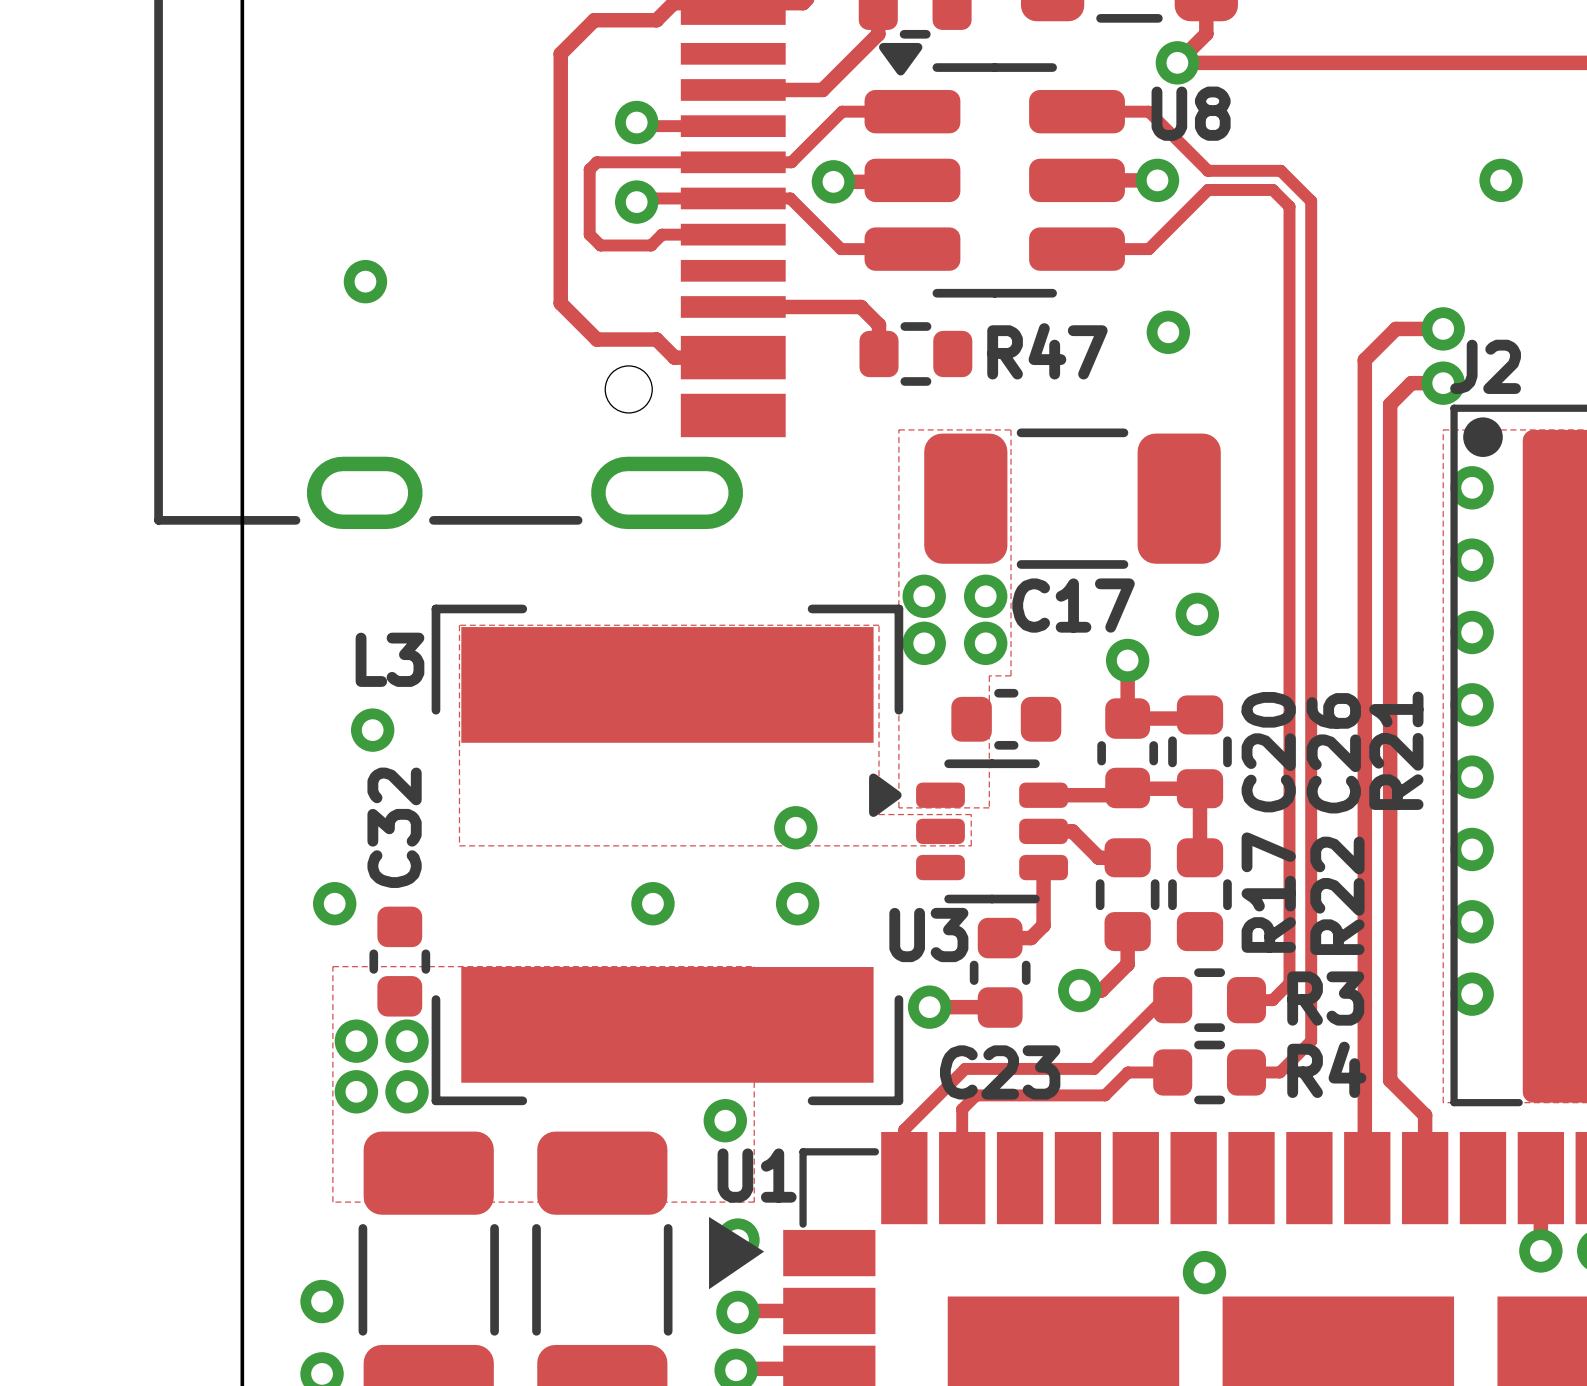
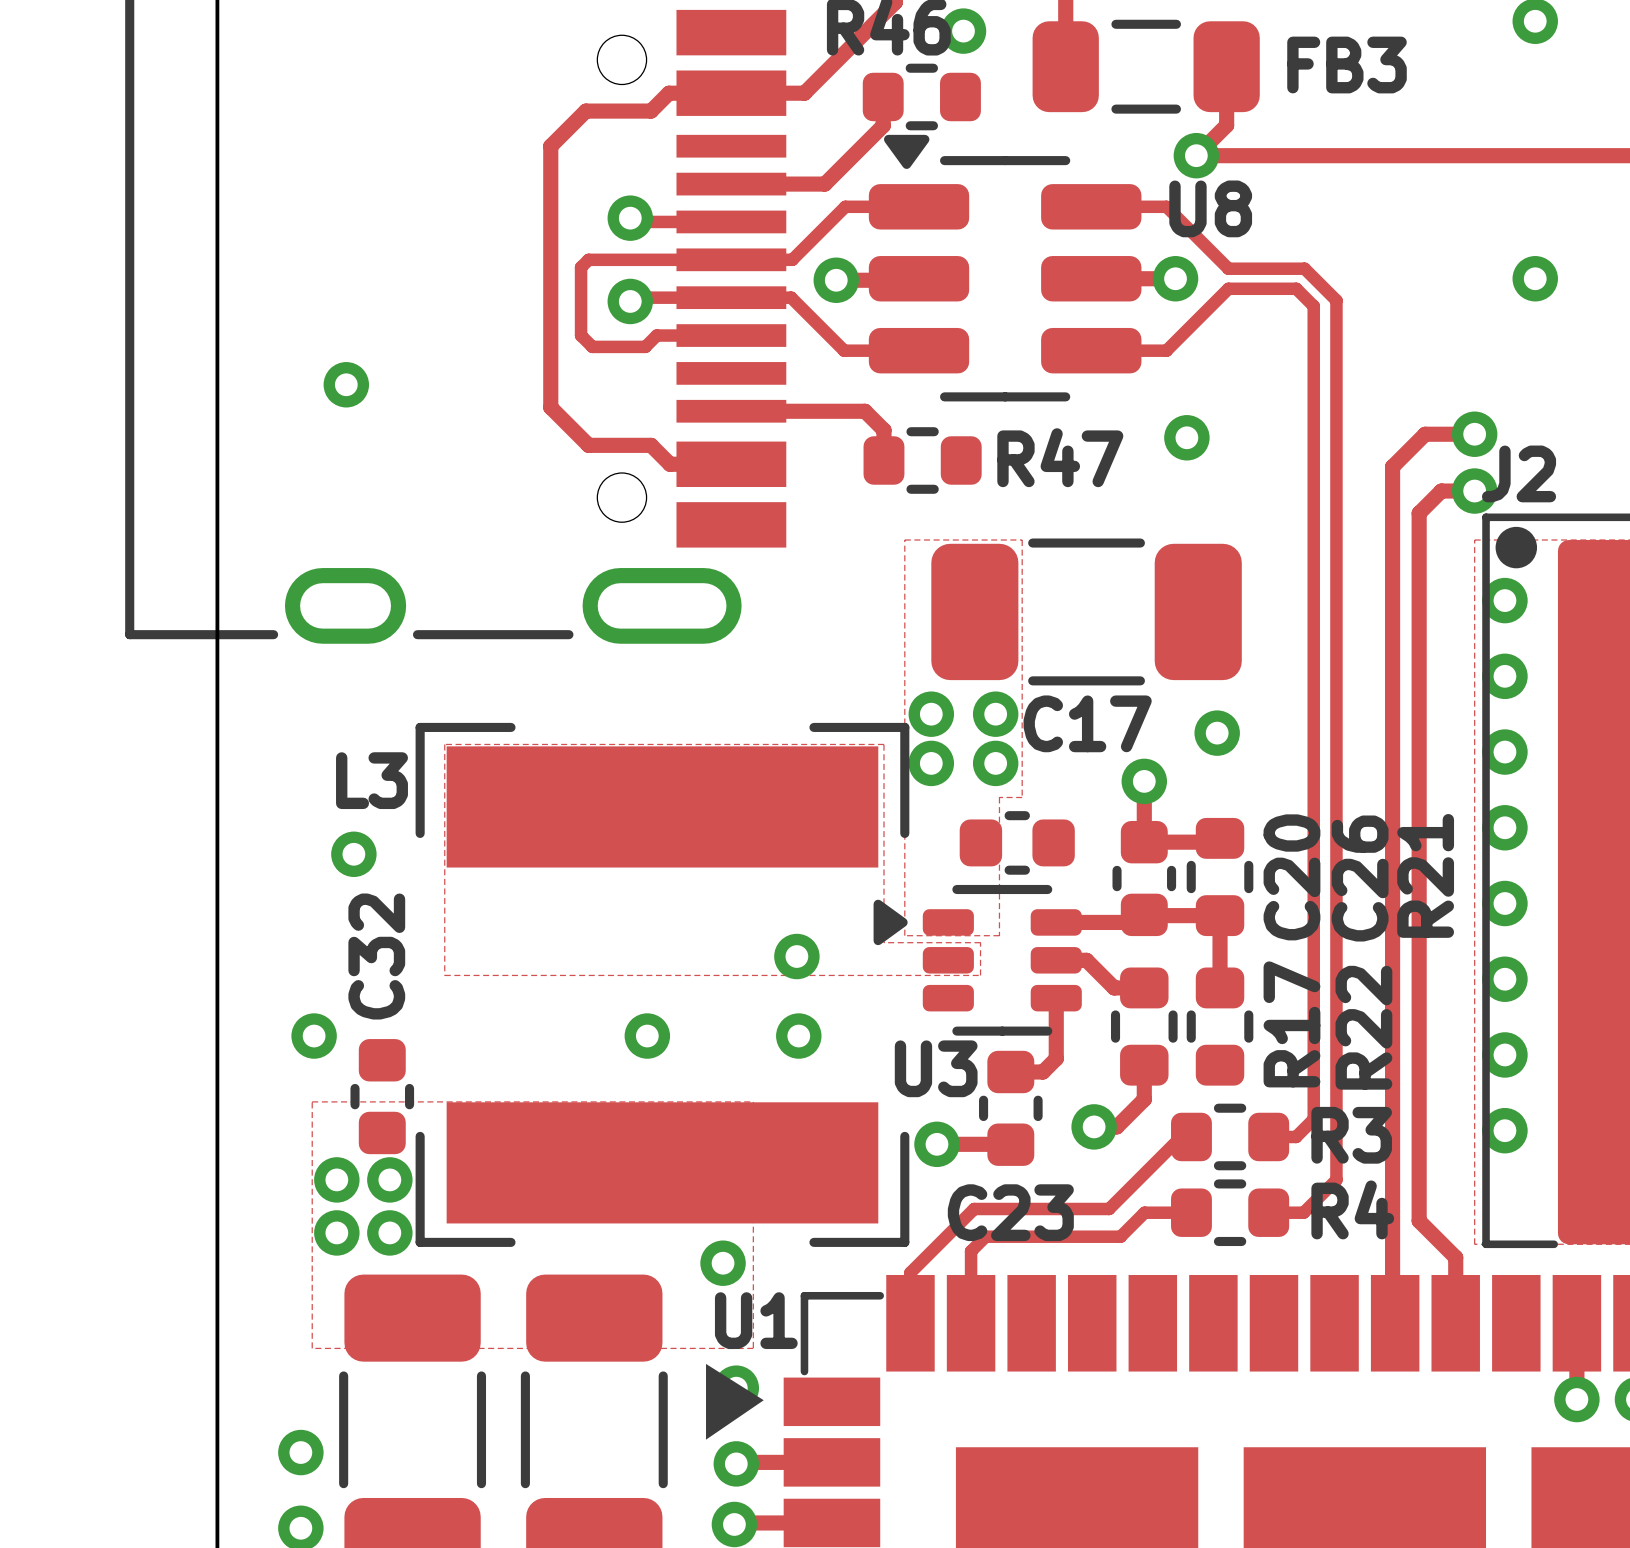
via: (1204, 1272) -> none

